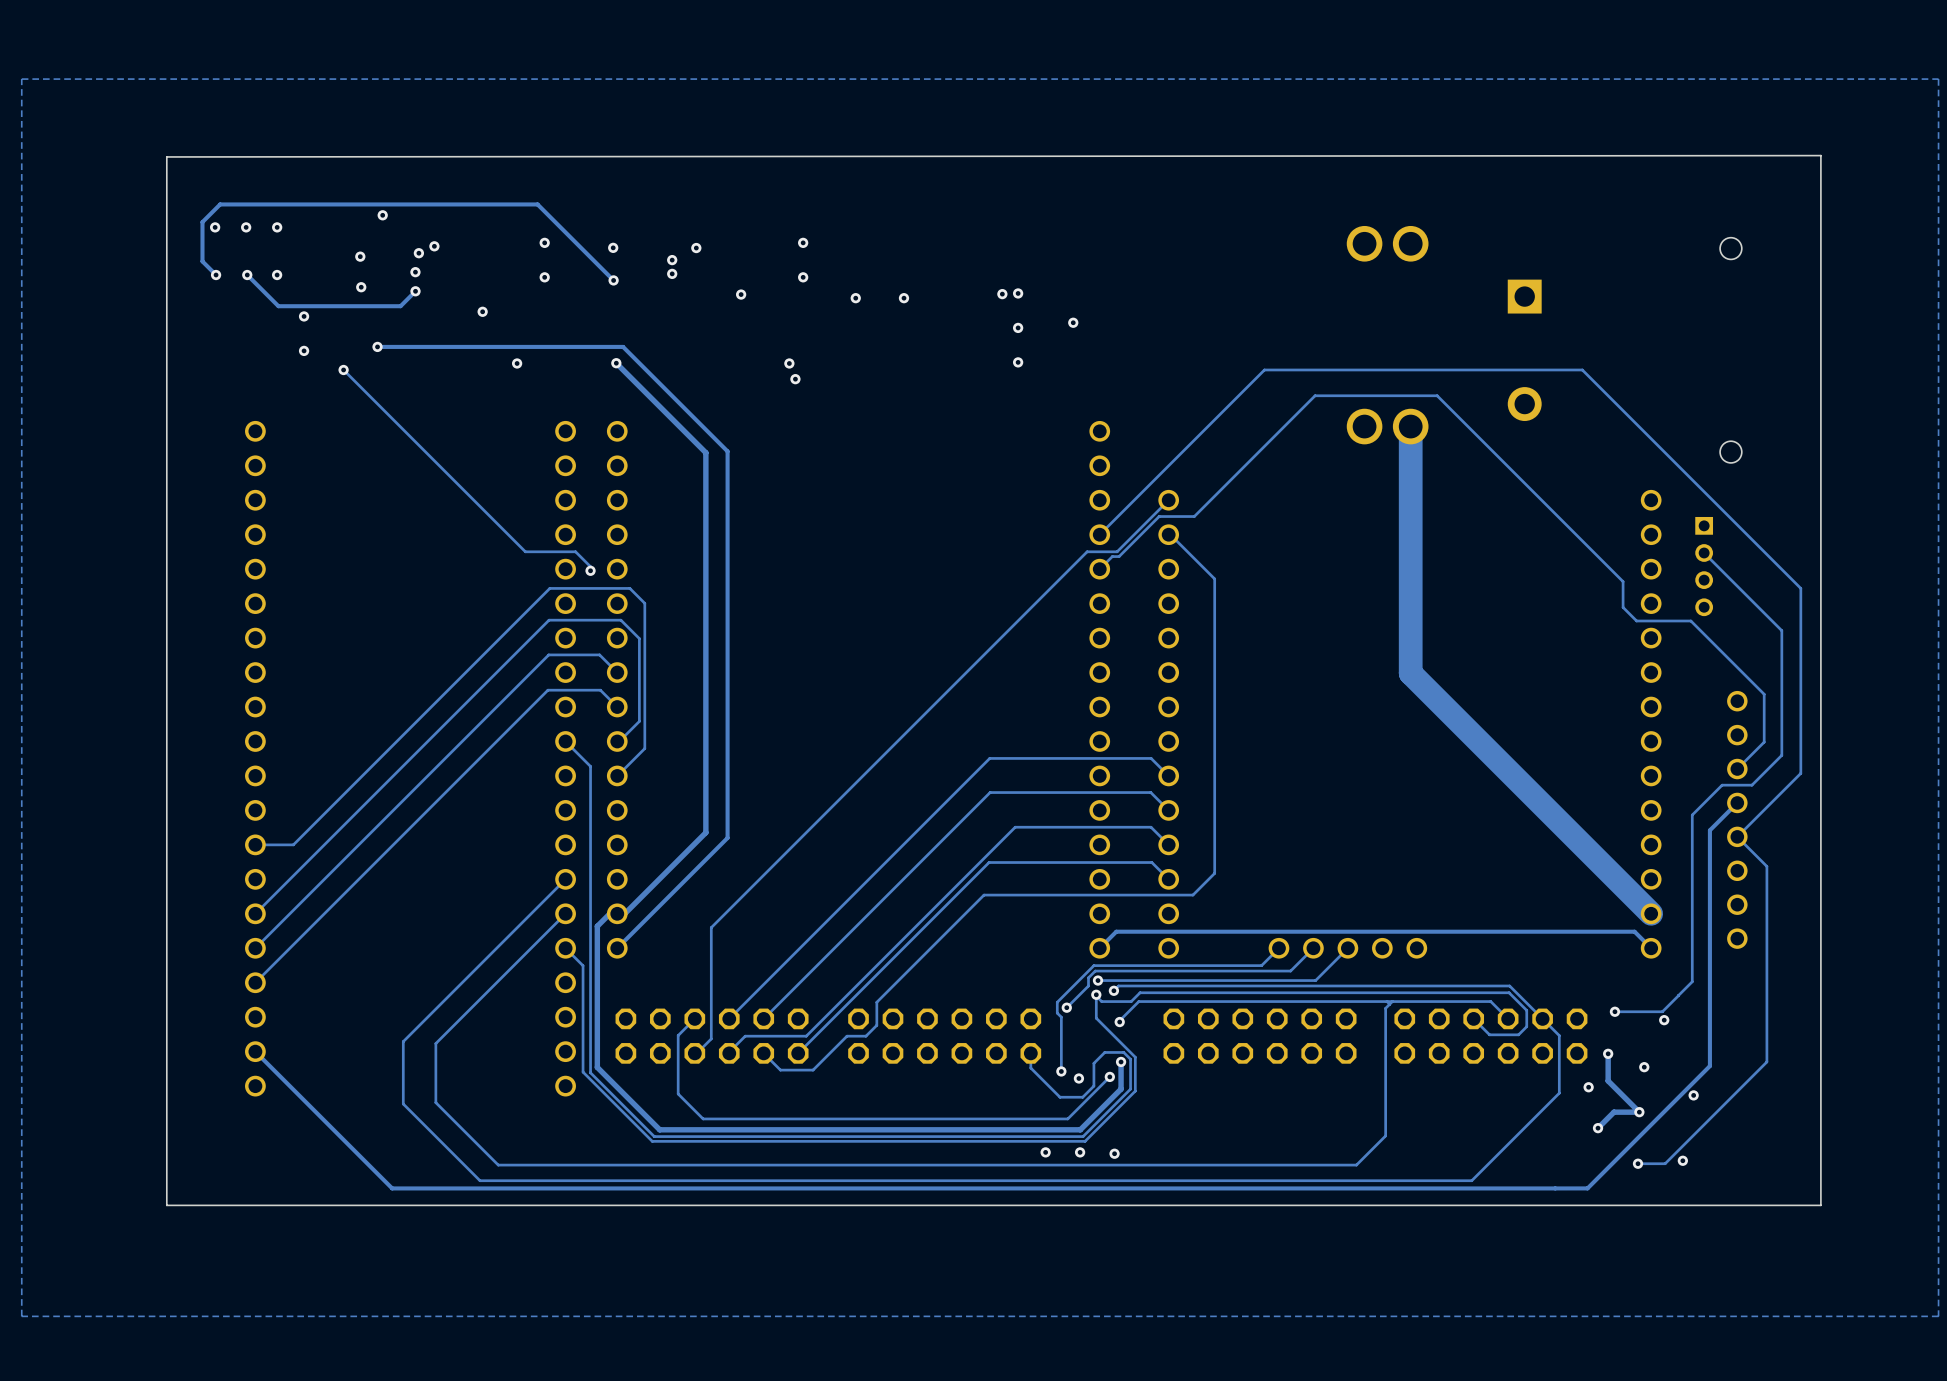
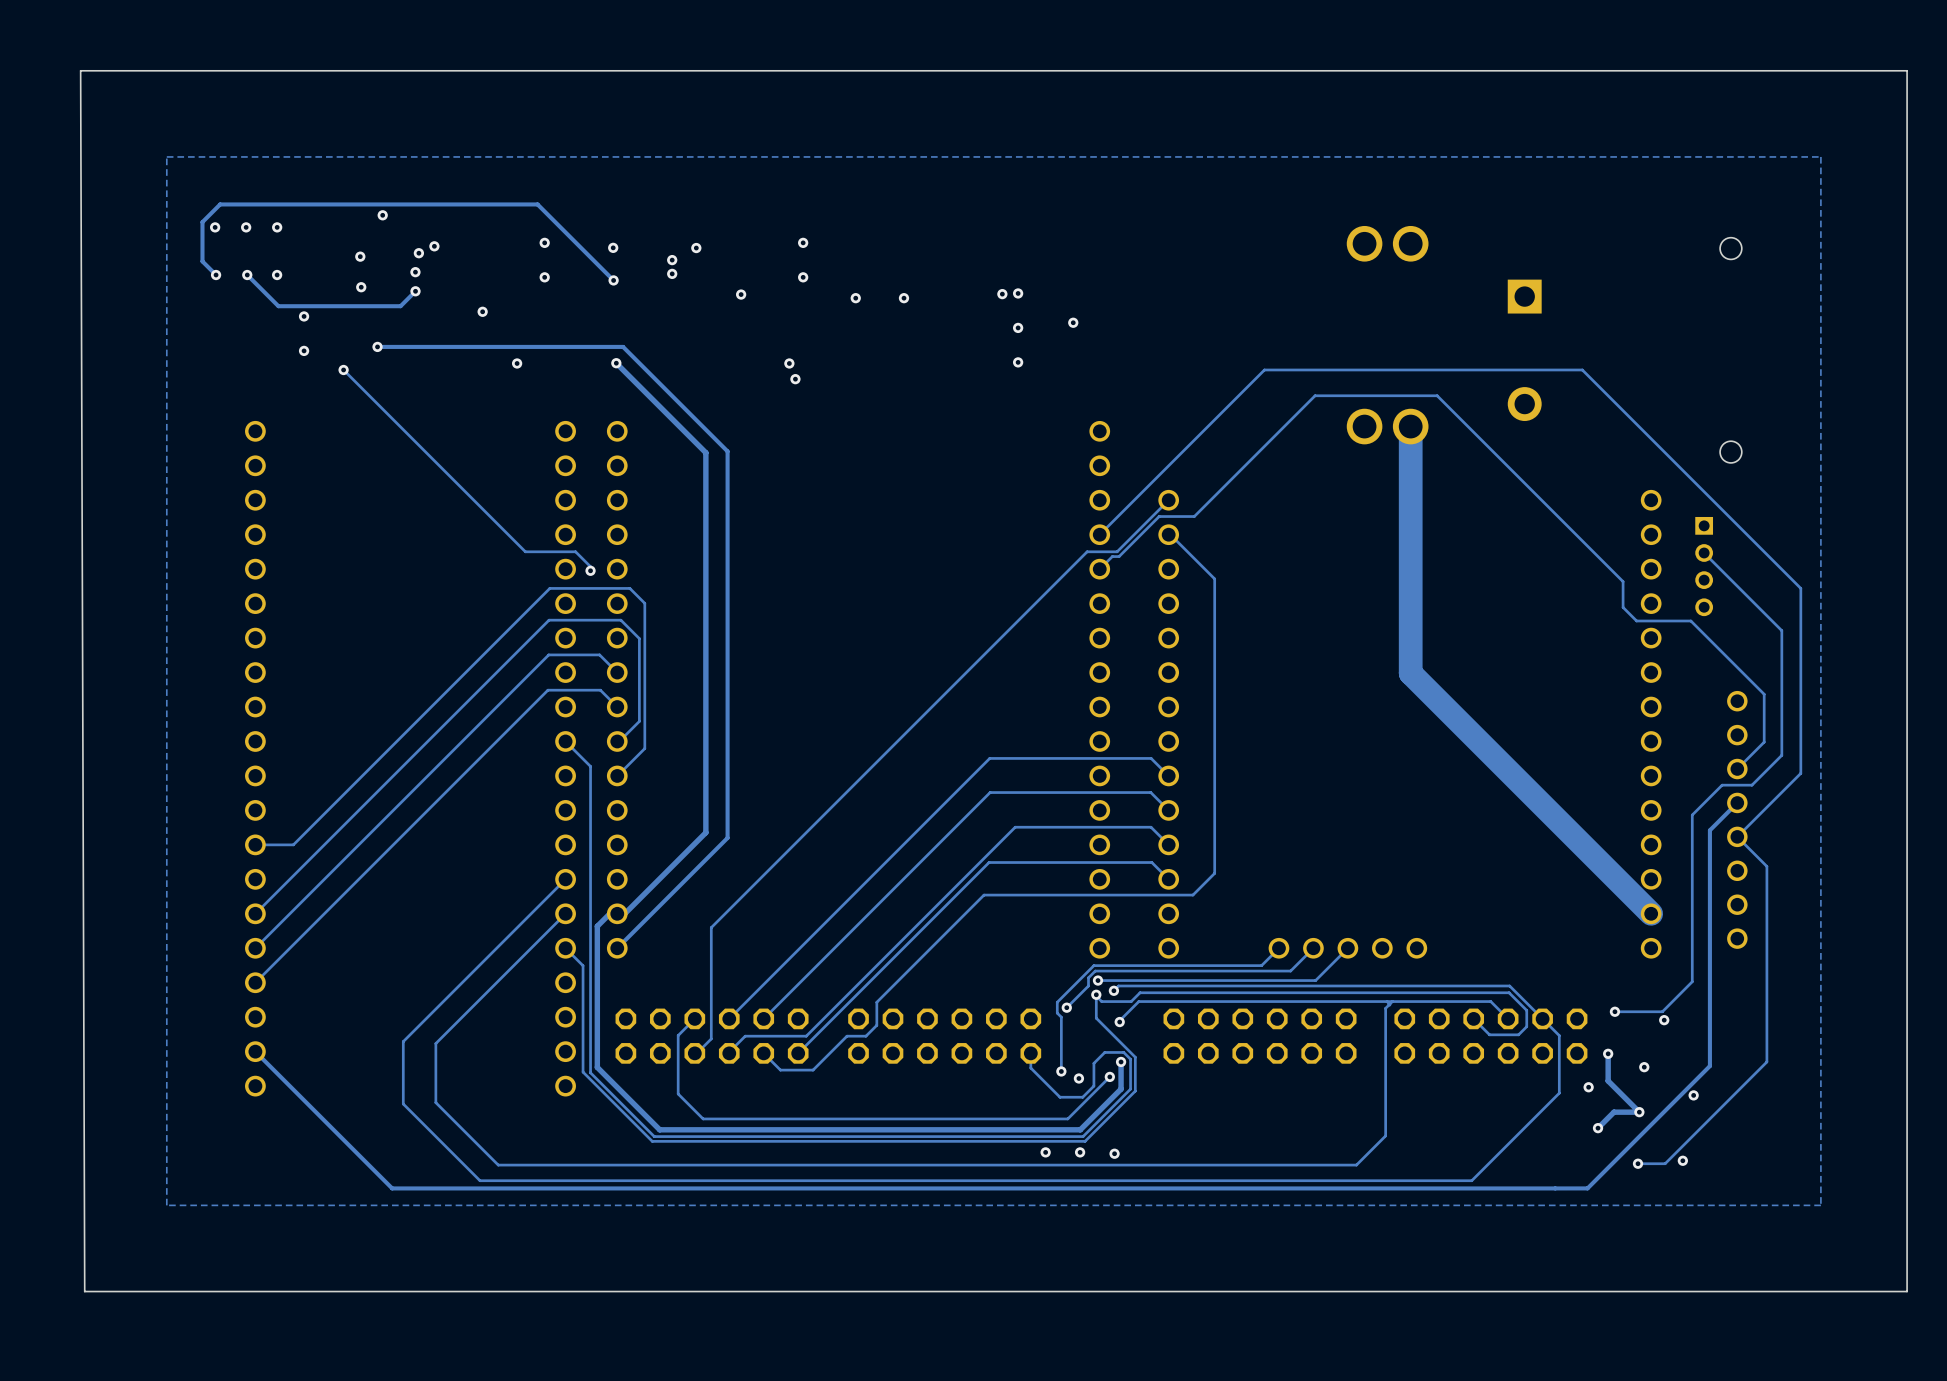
zone outline: (1938, 79) (1938, 1316) (21, 1316) (21, 79) (1938, 79) -> (1820, 156) (1820, 1205) (166, 1205) (166, 156) (1820, 156)
board edge: (1820, 155) (166, 156) (166, 1205) (1820, 1205) (1820, 155) -> (1907, 70) (1907, 1291) (84, 1291) (80, 70) (1907, 70)
track: (1651, 948) (1634, 931) (1116, 931) (1099, 948) -> none

